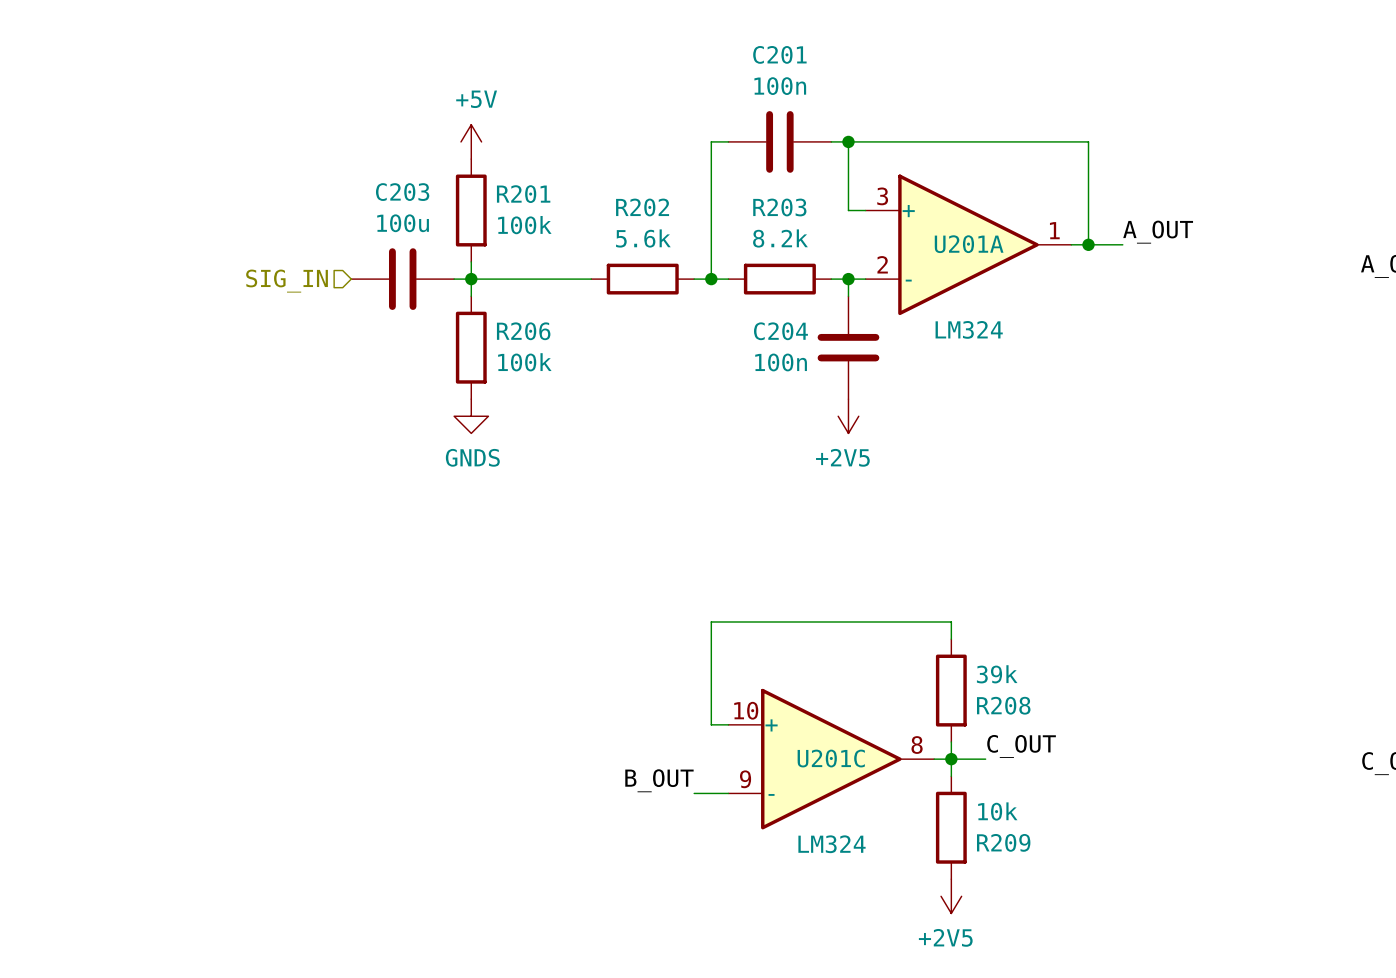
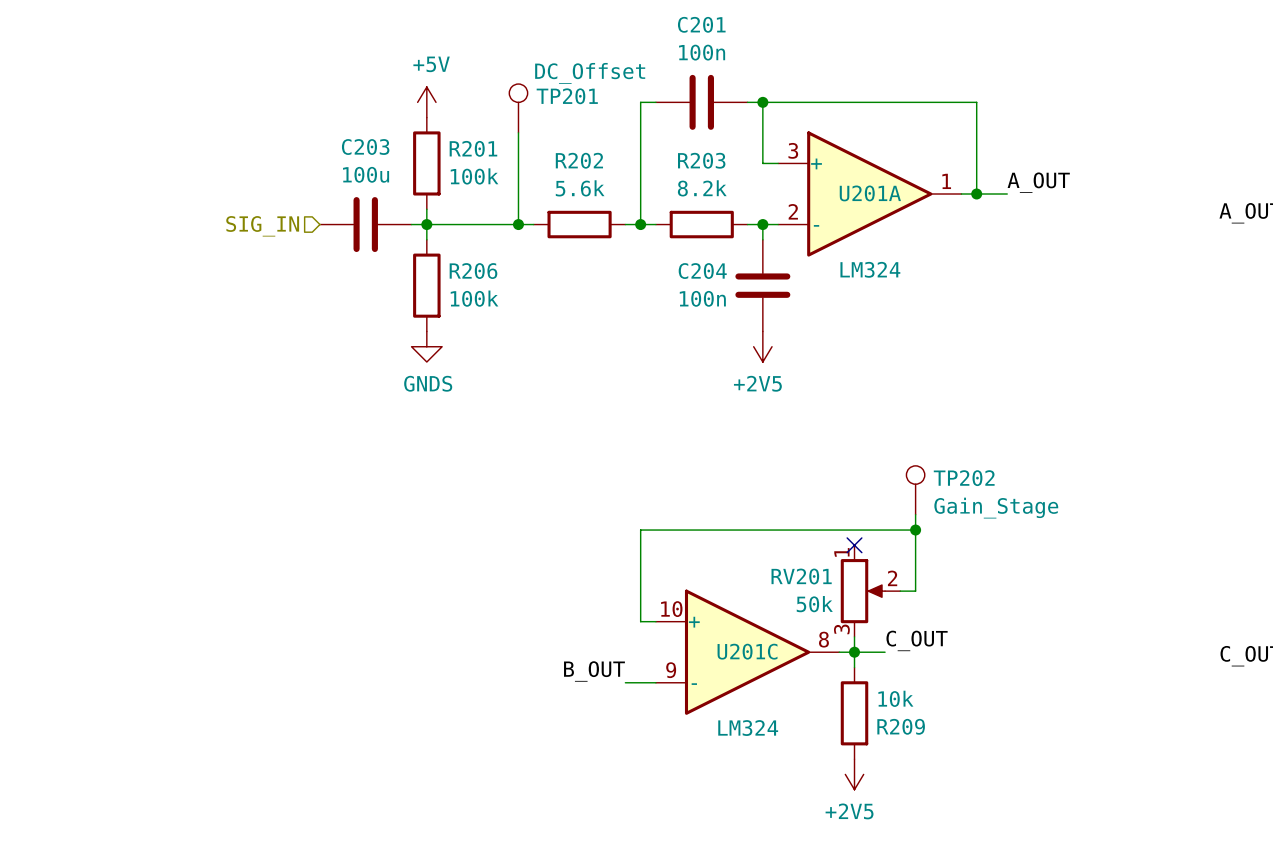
TP201: none -> DC_Offset (518, 108)
wire: none -> (518, 132) (518, 224)
junction: none -> (518, 224)
TP202: none -> Gain_Stage (915, 490)
wire: none -> (915, 514) (915, 591) (900, 591)
wire: (951, 621) (951, 639) -> (854, 530) (915, 530)
junction: none -> (915, 530)
no-connect mark: none -> (854, 545)
R208: 39k (951, 690) -> none
RV201: none -> 50k (870, 591)

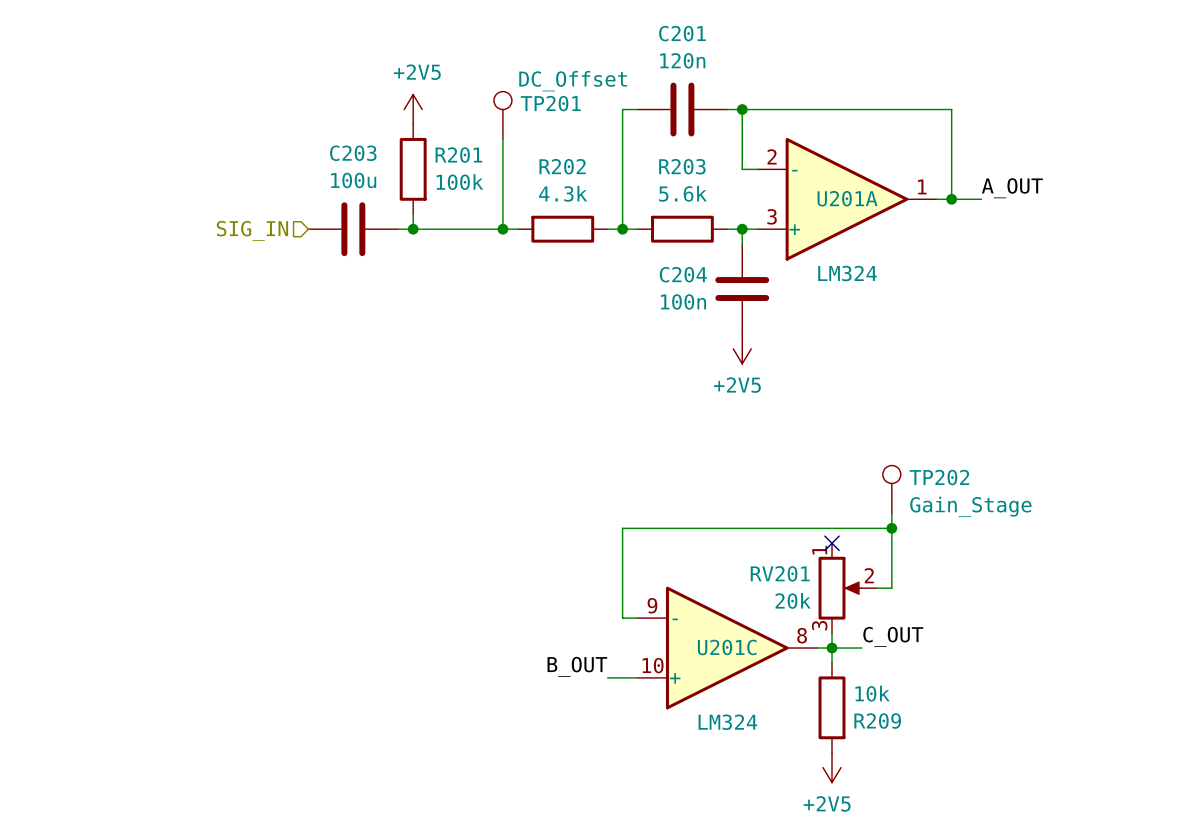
C201 value: 100n (702, 52) -> 120n (682, 60)
power symbol: +5V (426, 102) -> +2V5 (413, 109)
R202 value: 5.6k (580, 188) -> 4.3k (563, 193)
R203 value: 8.2k (702, 188) -> 5.6k (682, 193)
U201A flip: as is (869, 194) -> up-down (846, 199)
wire: (426, 224) (426, 239) -> none
R206: 100k (426, 285) -> none
power symbol: GNDS (426, 346) -> none
RV201 value: 50k (814, 604) -> 20k (793, 600)
U201C flip: as is (747, 652) -> up-down (727, 648)

